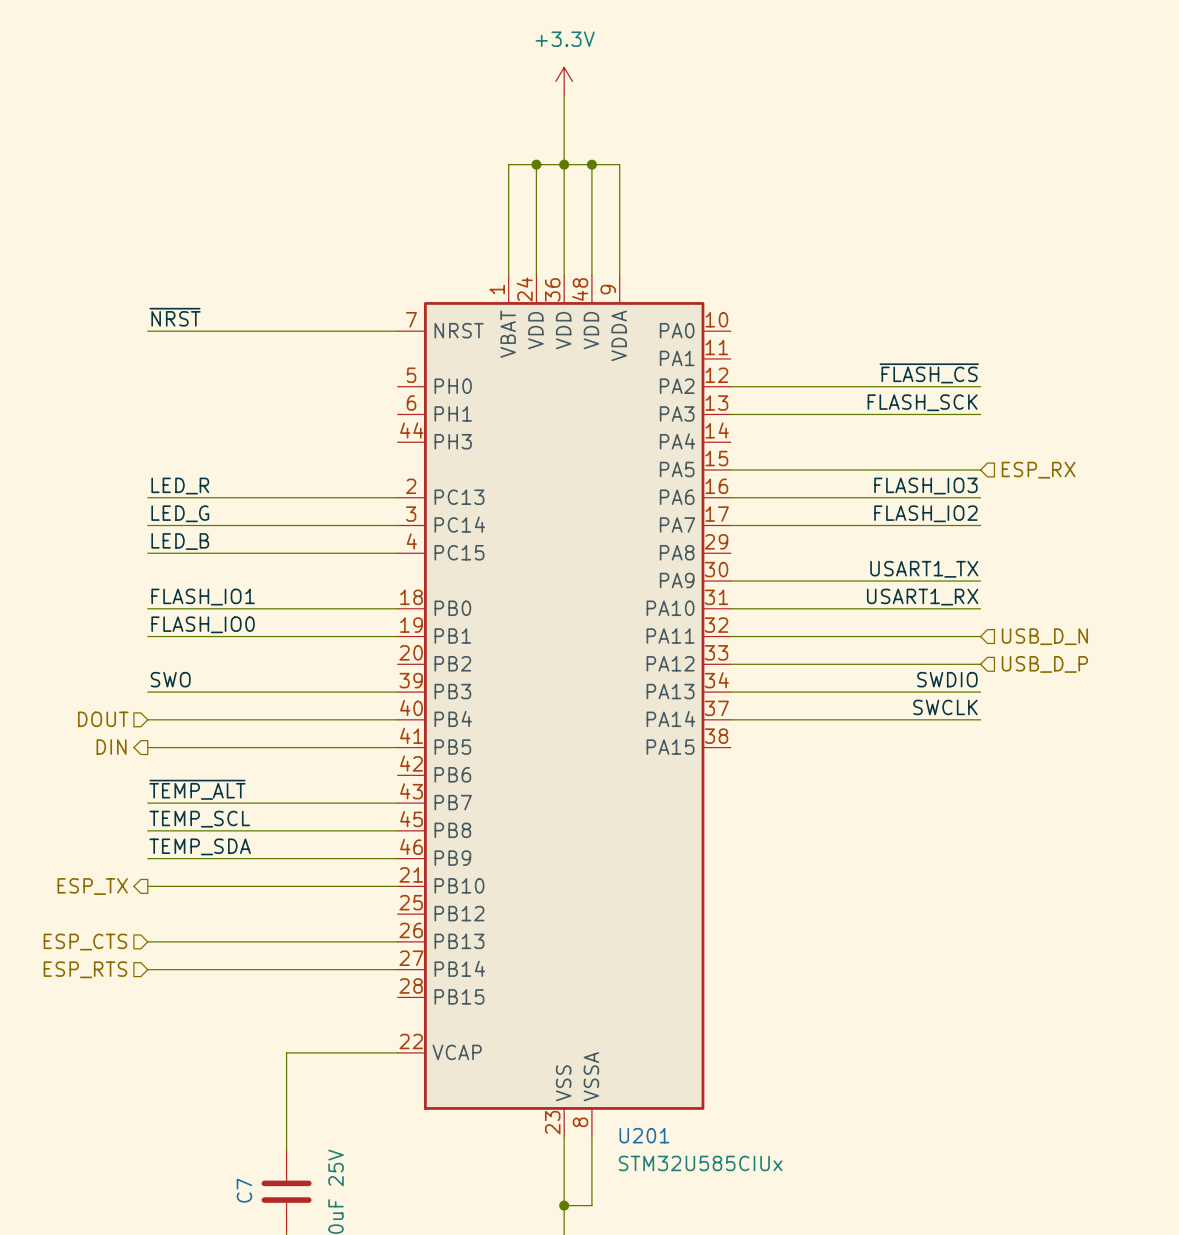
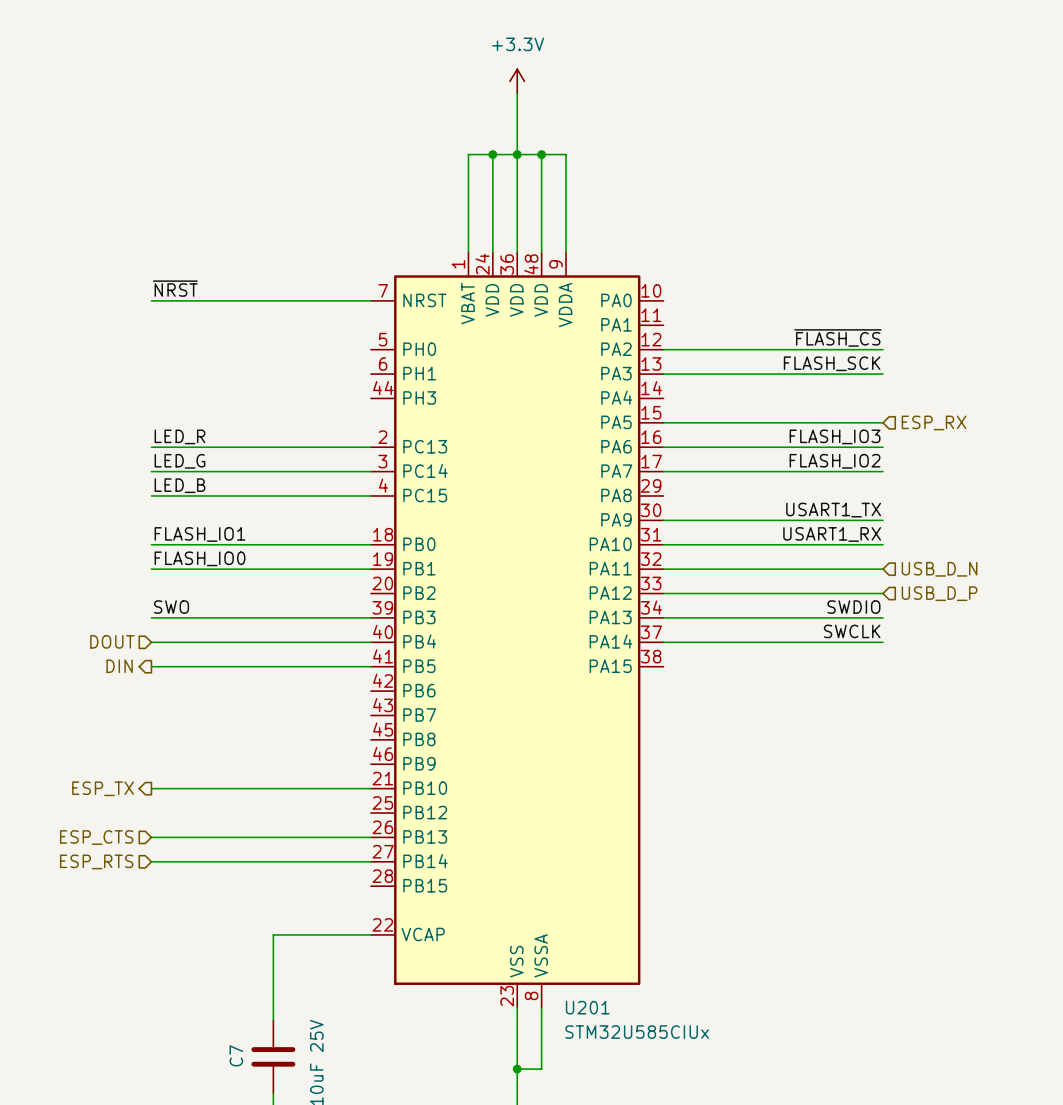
label: ~{TEMP_ALT} (197, 789) -> none
wire: (147, 803) (397, 803) -> none
label: TEMP_SCL (199, 819) -> none
wire: (147, 830) (397, 830) -> none
label: TEMP_SDA (200, 846) -> none
wire: (147, 858) (397, 858) -> none

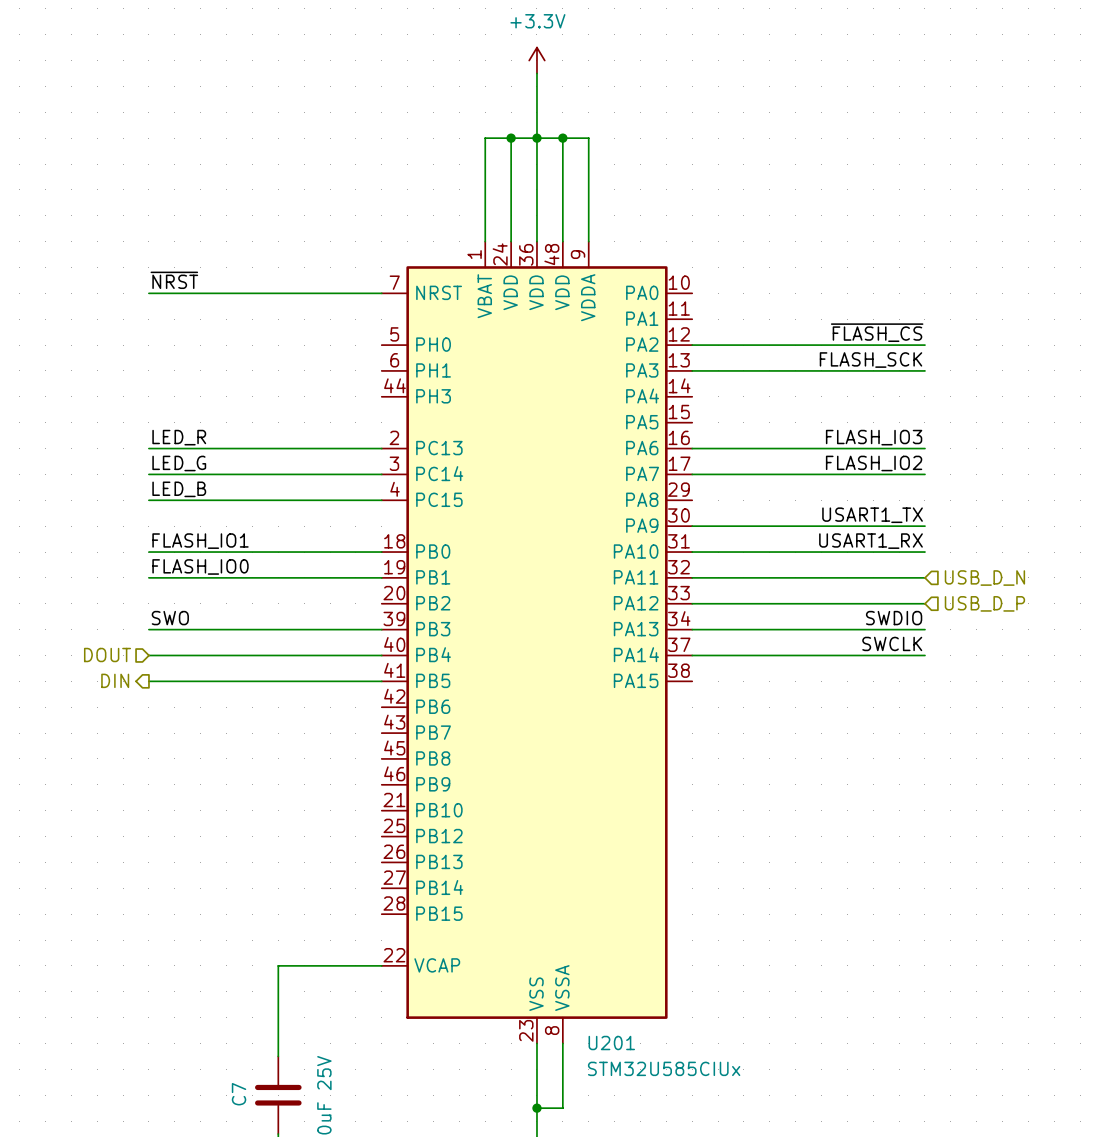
wire: (663, 422) (883, 422) -> none
hierarchical label: ESP_RX (934, 422) -> none
hierarchical label: ESP_TX (103, 788) -> none
wire: (151, 788) (370, 788) -> none
hierarchical label: ESP_CTS (96, 837) -> none
wire: (151, 837) (370, 837) -> none
hierarchical label: ESP_RTS (96, 861) -> none
wire: (151, 861) (370, 861) -> none

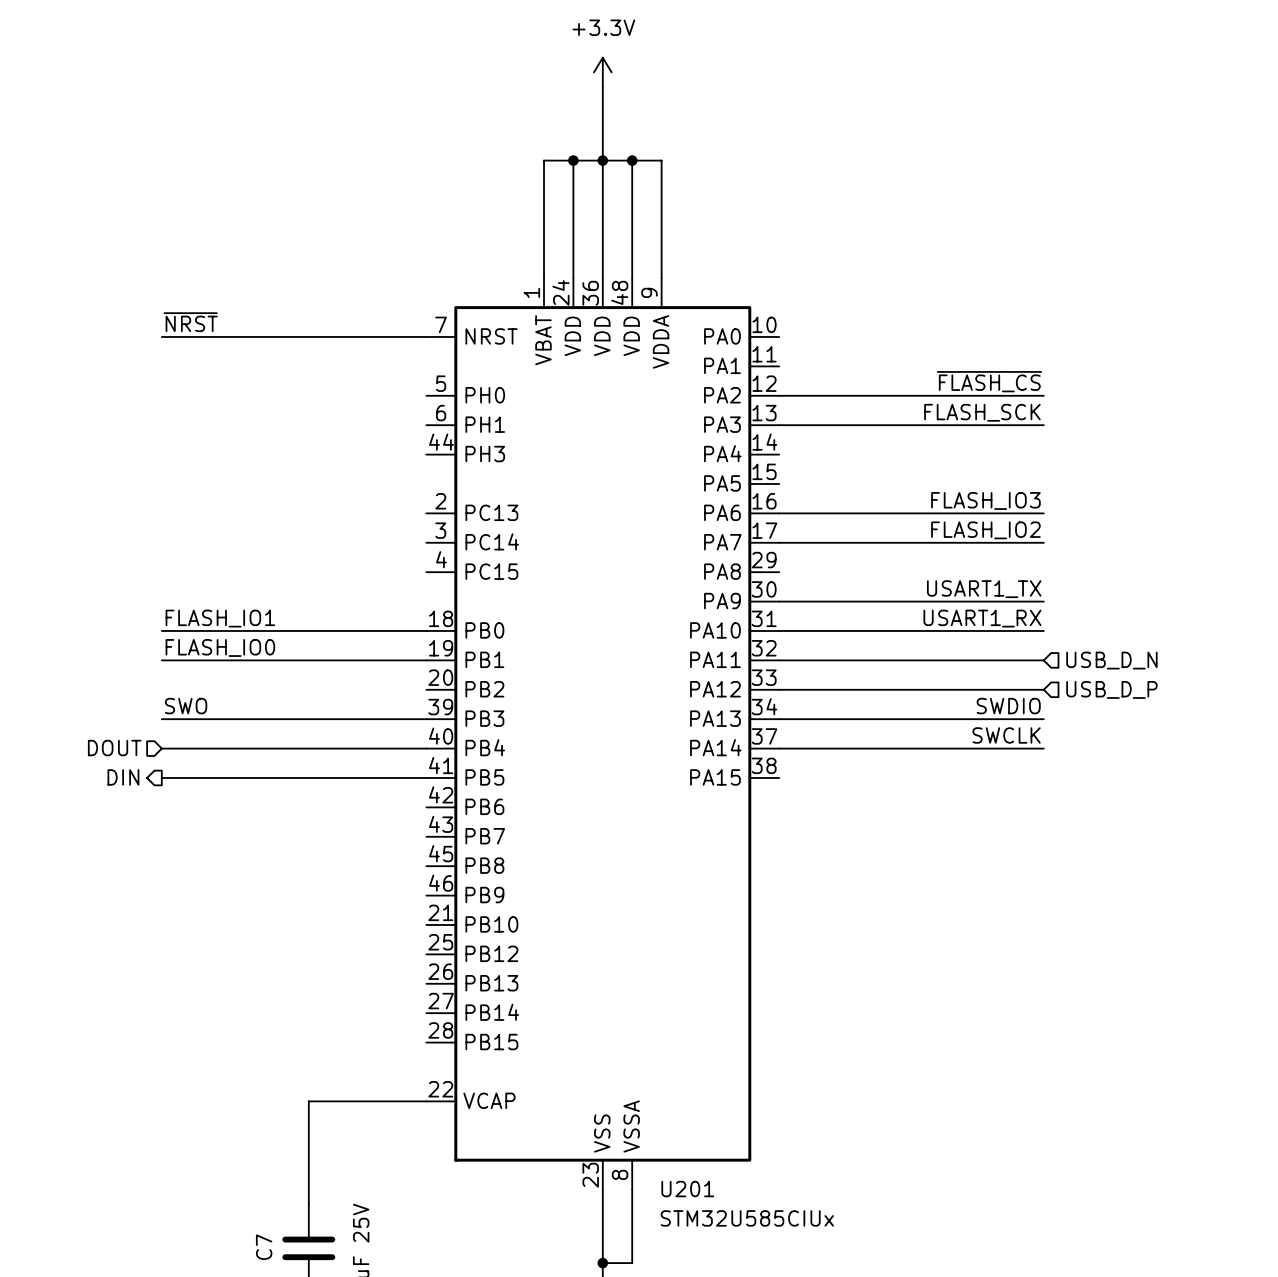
label: LED_R (179, 437) -> none
wire: (148, 448) (381, 448) -> none
label: LED_G (179, 463) -> none
wire: (148, 474) (381, 474) -> none
label: LED_B (179, 489) -> none
wire: (148, 500) (381, 500) -> none

